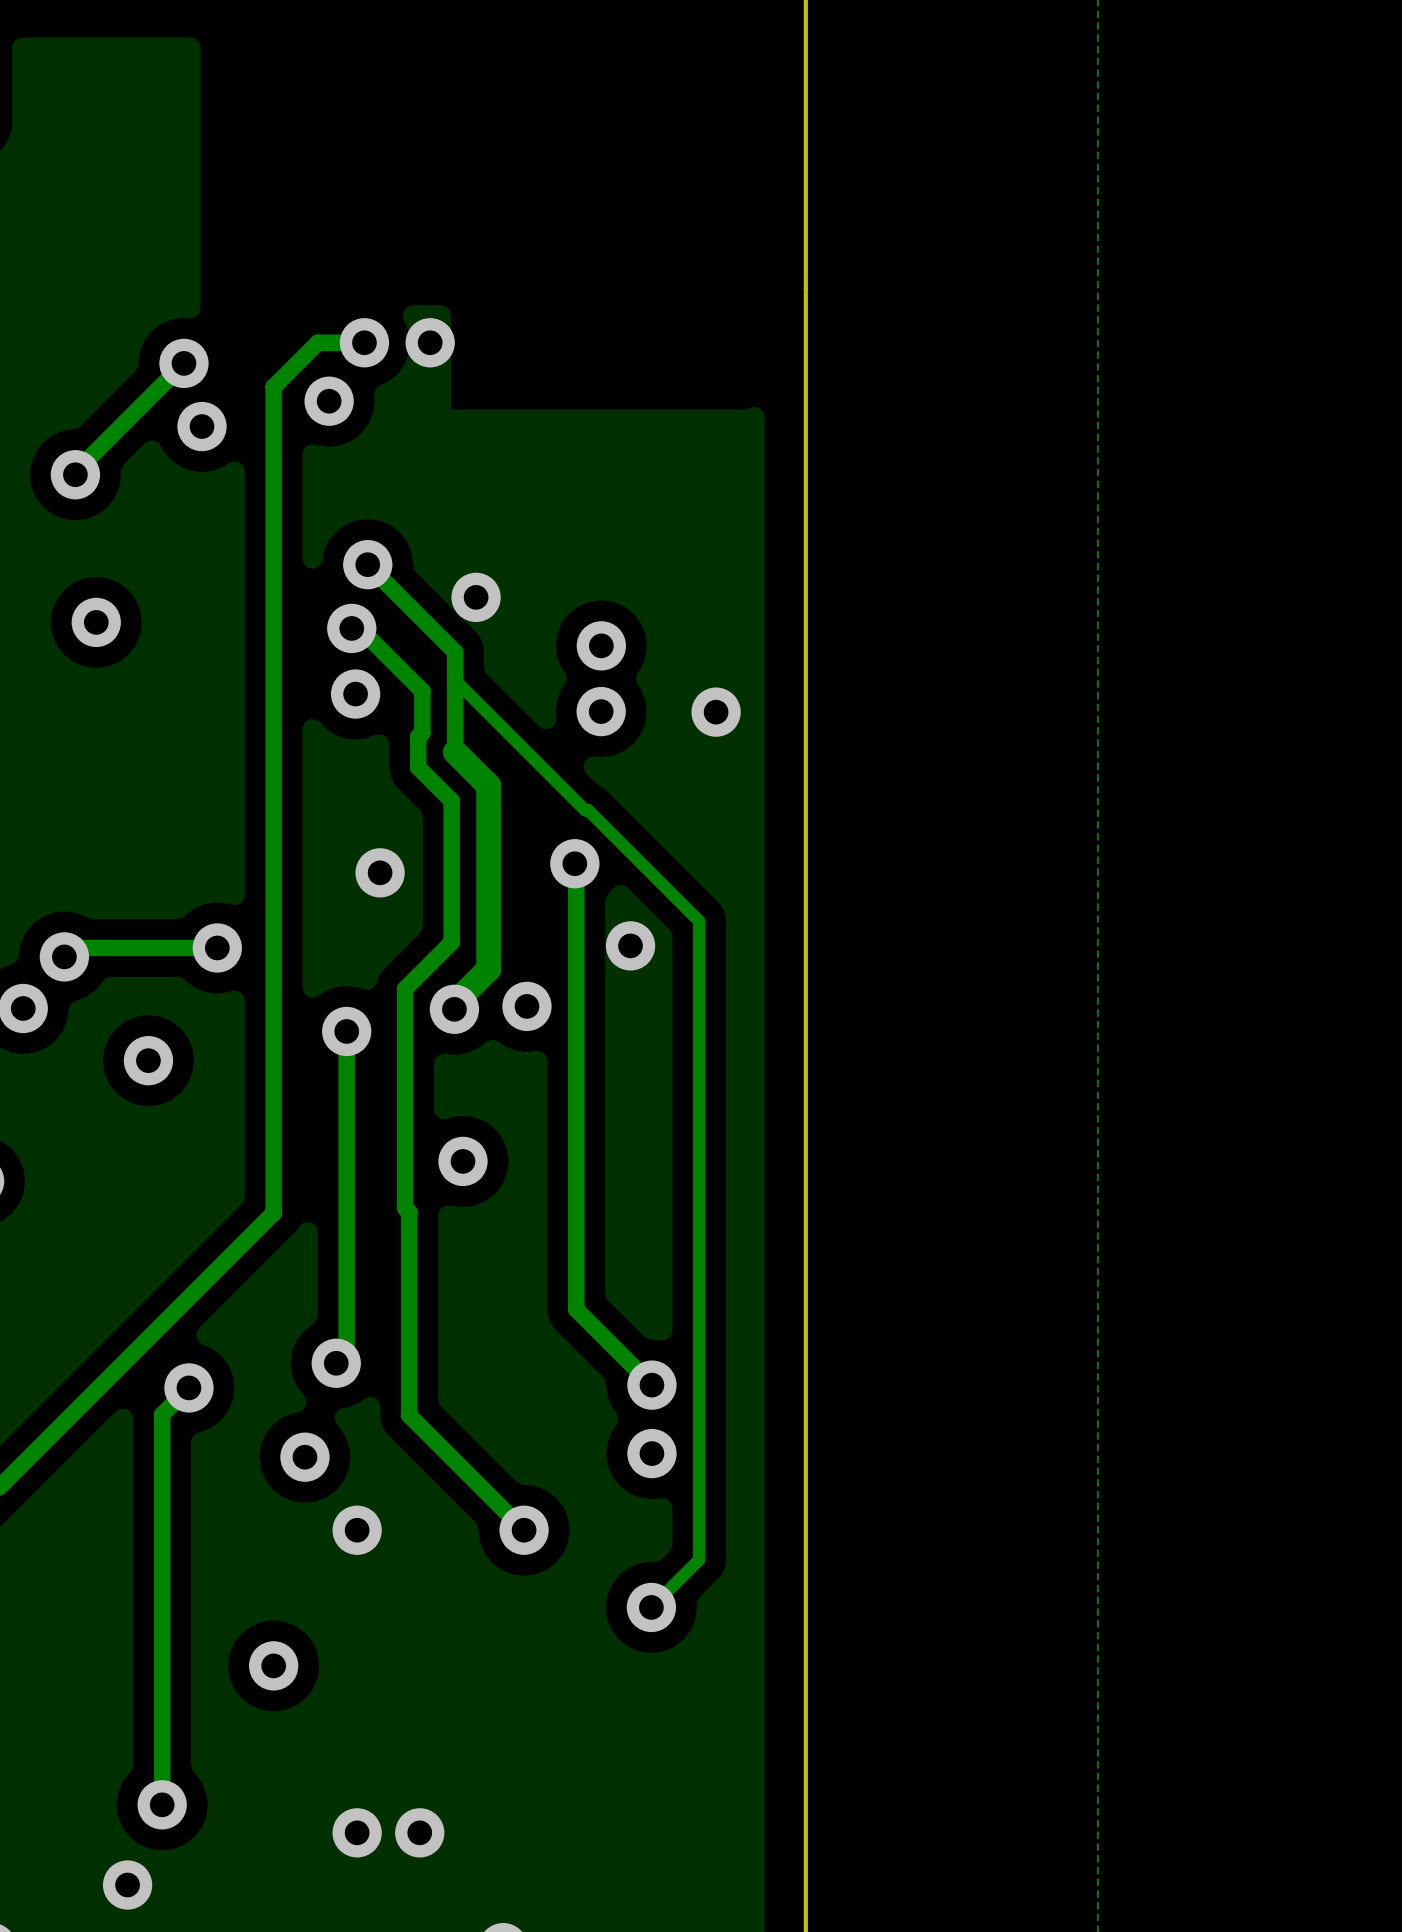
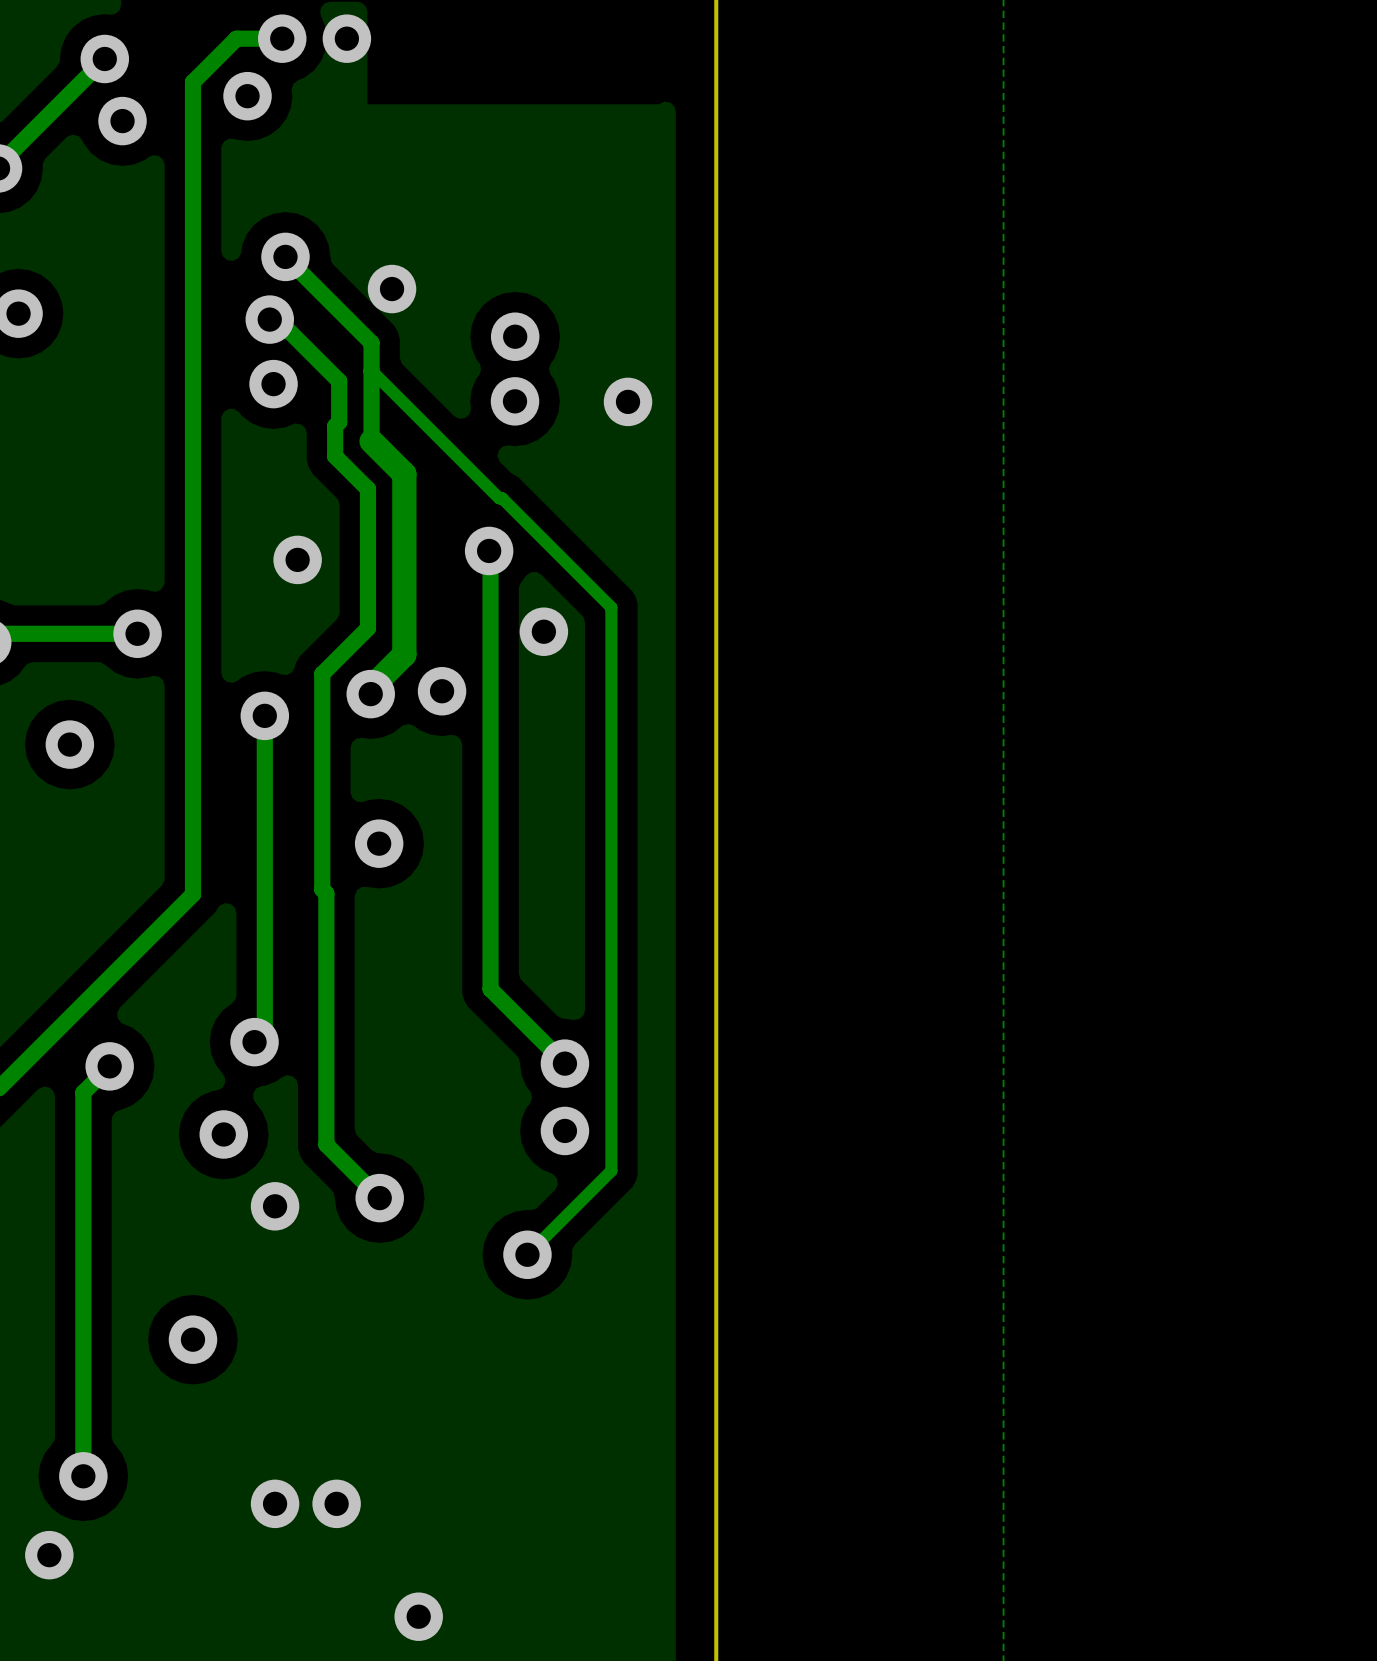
track: (409, 1415) (524, 1530) -> (326, 1093) (326, 1144) (379, 1198)
track: (699, 1494) (699, 1559) (651, 1607) -> (611, 1170) (527, 1254)
via: none -> (379, 1198)
via: (524, 1530) -> none
via position: (651, 1607) -> (527, 1254)

